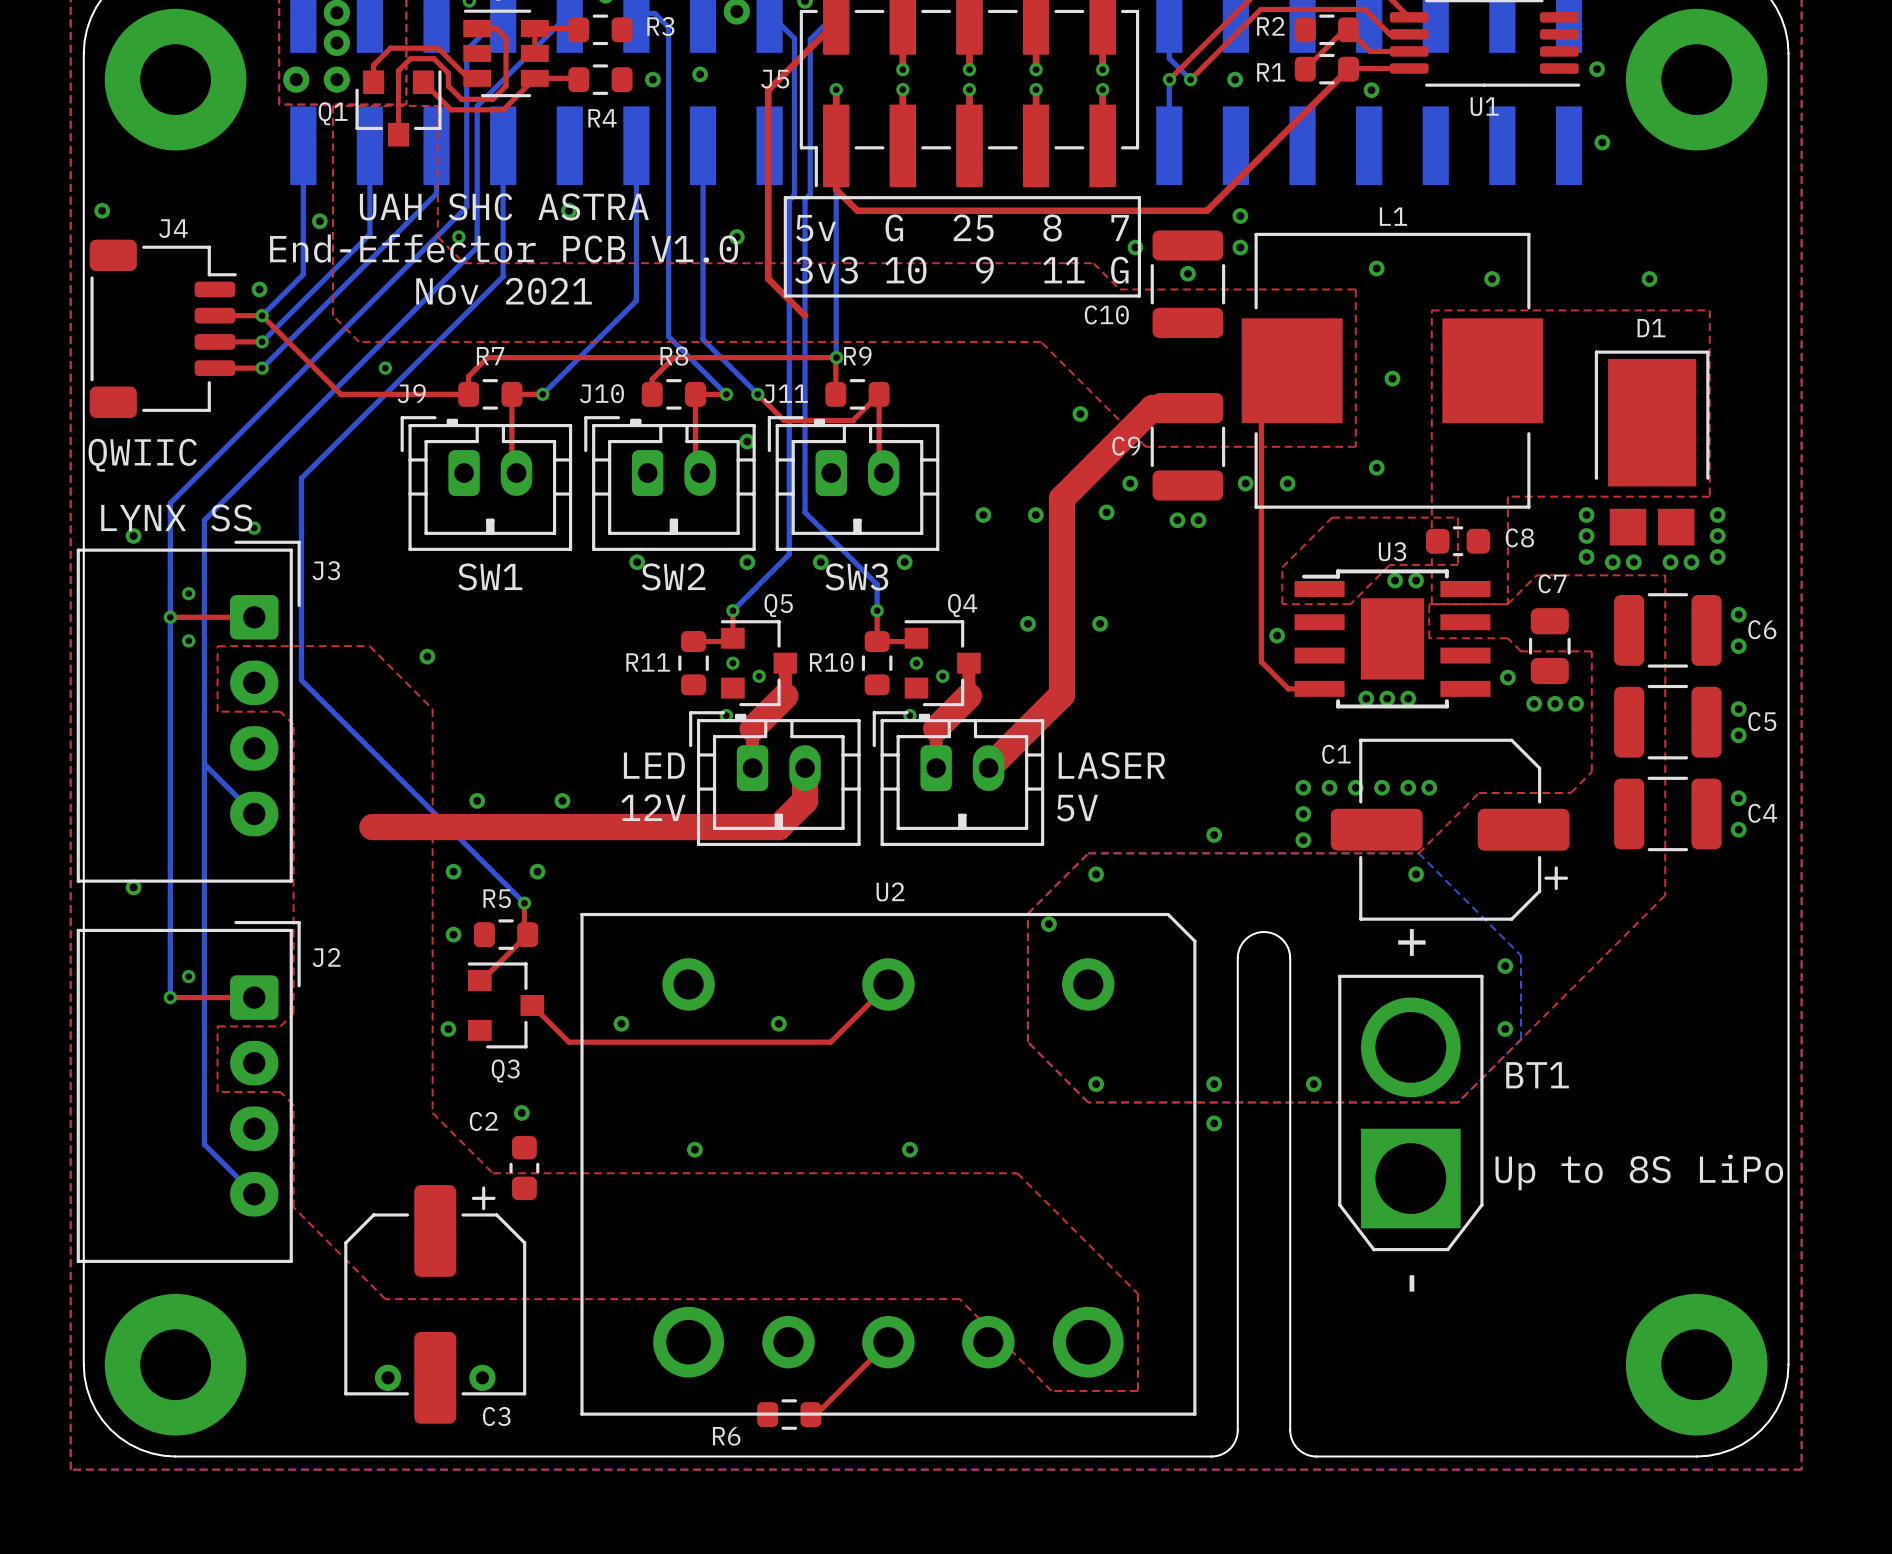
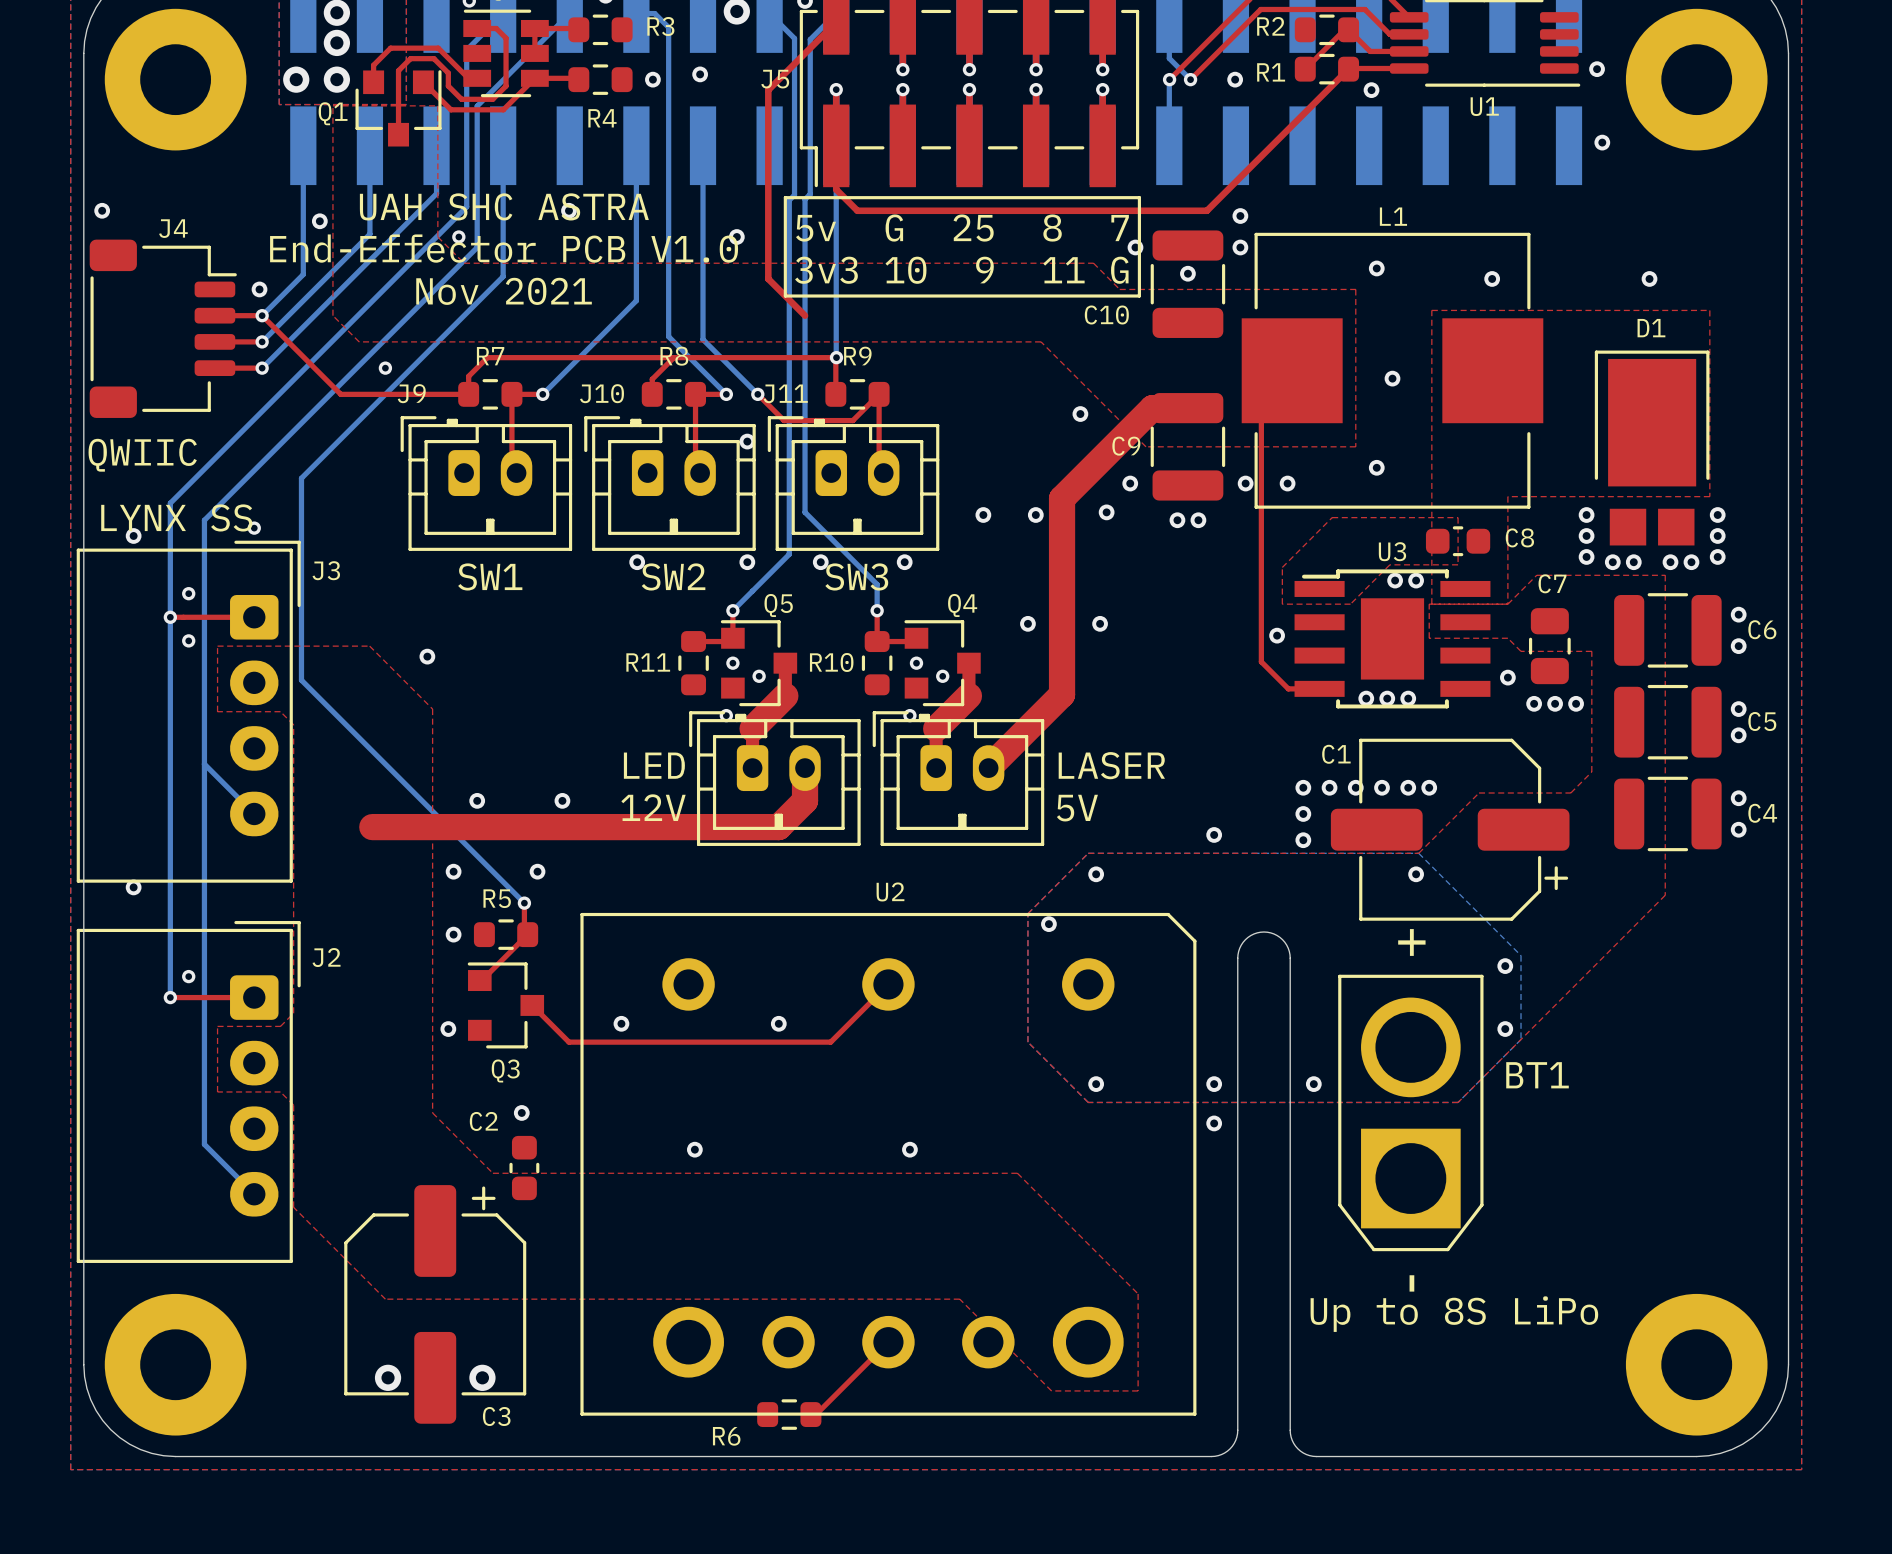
text position: Up to 8S LiPo (1639, 1172) -> Up to 8S LiPo (1454, 1314)

